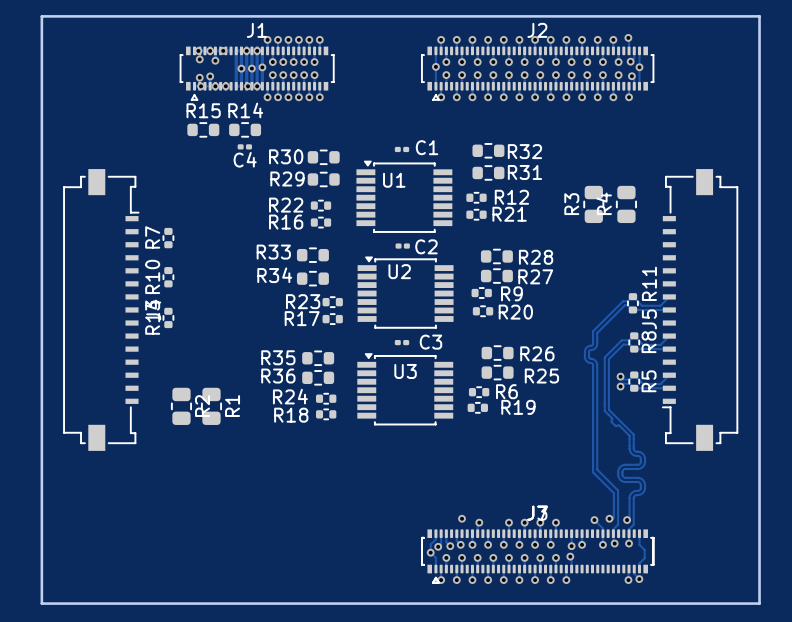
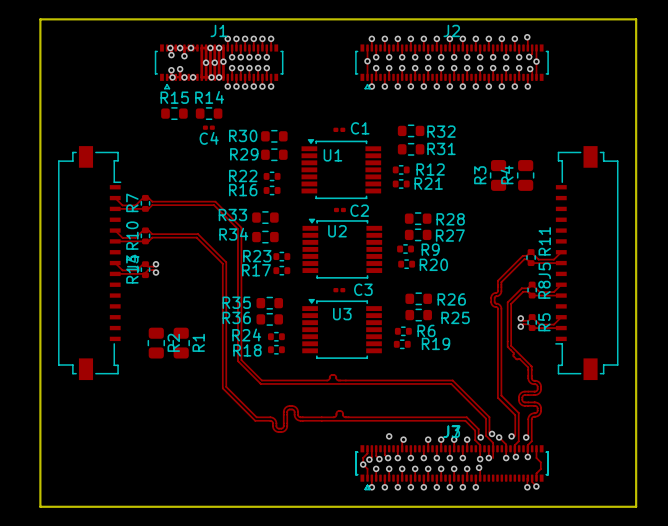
track: none -> (115, 198) (122, 205) (135, 205) (143, 197) (148, 197) (152, 201) (215, 201) (241, 227) (241, 360) (261, 380) (327, 380) (332, 374) (338, 380) (452, 380) (489, 417) (489, 433)
track: none -> (115, 208) (148, 208) (152, 205) (213, 205) (237, 229) (238, 361)
track: none -> (115, 230) (122, 237) (135, 237) (143, 230) (148, 230) (152, 234) (198, 234) (226, 262) (226, 386) (256, 417) (272, 417) (279, 428) (283, 427) (283, 410) (289, 406) (296, 407) (300, 417) (334, 417) (337, 411) (340, 411) (345, 417) (466, 417) (478, 429) (480, 437)
track: none -> (115, 241) (148, 241) (152, 237) (196, 237) (222, 263) (222, 388) (255, 420) (271, 421) (273, 429) (279, 432) (286, 428) (287, 411) (289, 409) (293, 410) (295, 417) (299, 420) (465, 420) (475, 430) (475, 440) (480, 445) (480, 448)
track: none -> (115, 263) (122, 270) (136, 270) (144, 262) (148, 266) (153, 266) (156, 264)
via: none -> (156, 264)
track: none -> (156, 272) (153, 270) (148, 270) (144, 273) (115, 273)
via: none -> (156, 272)
track: none -> (238, 361) (260, 383)
track: none -> (260, 383) (451, 383) (486, 418) (486, 435) (493, 442) (493, 458)
via: none -> (492, 433)
via: none -> (480, 437)

